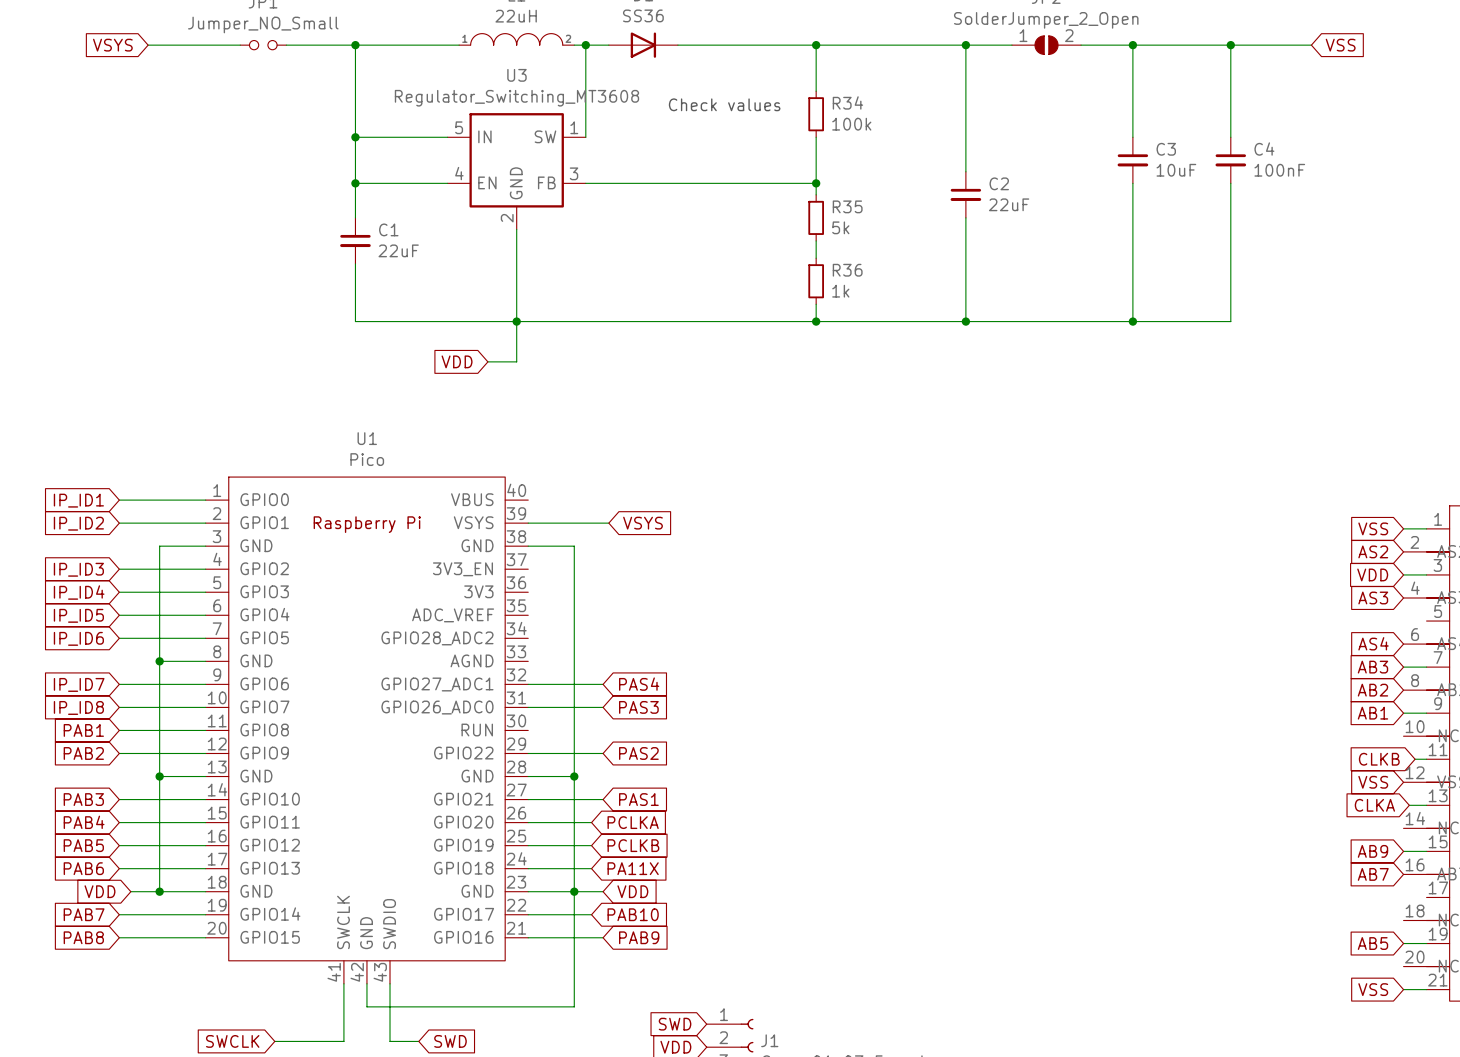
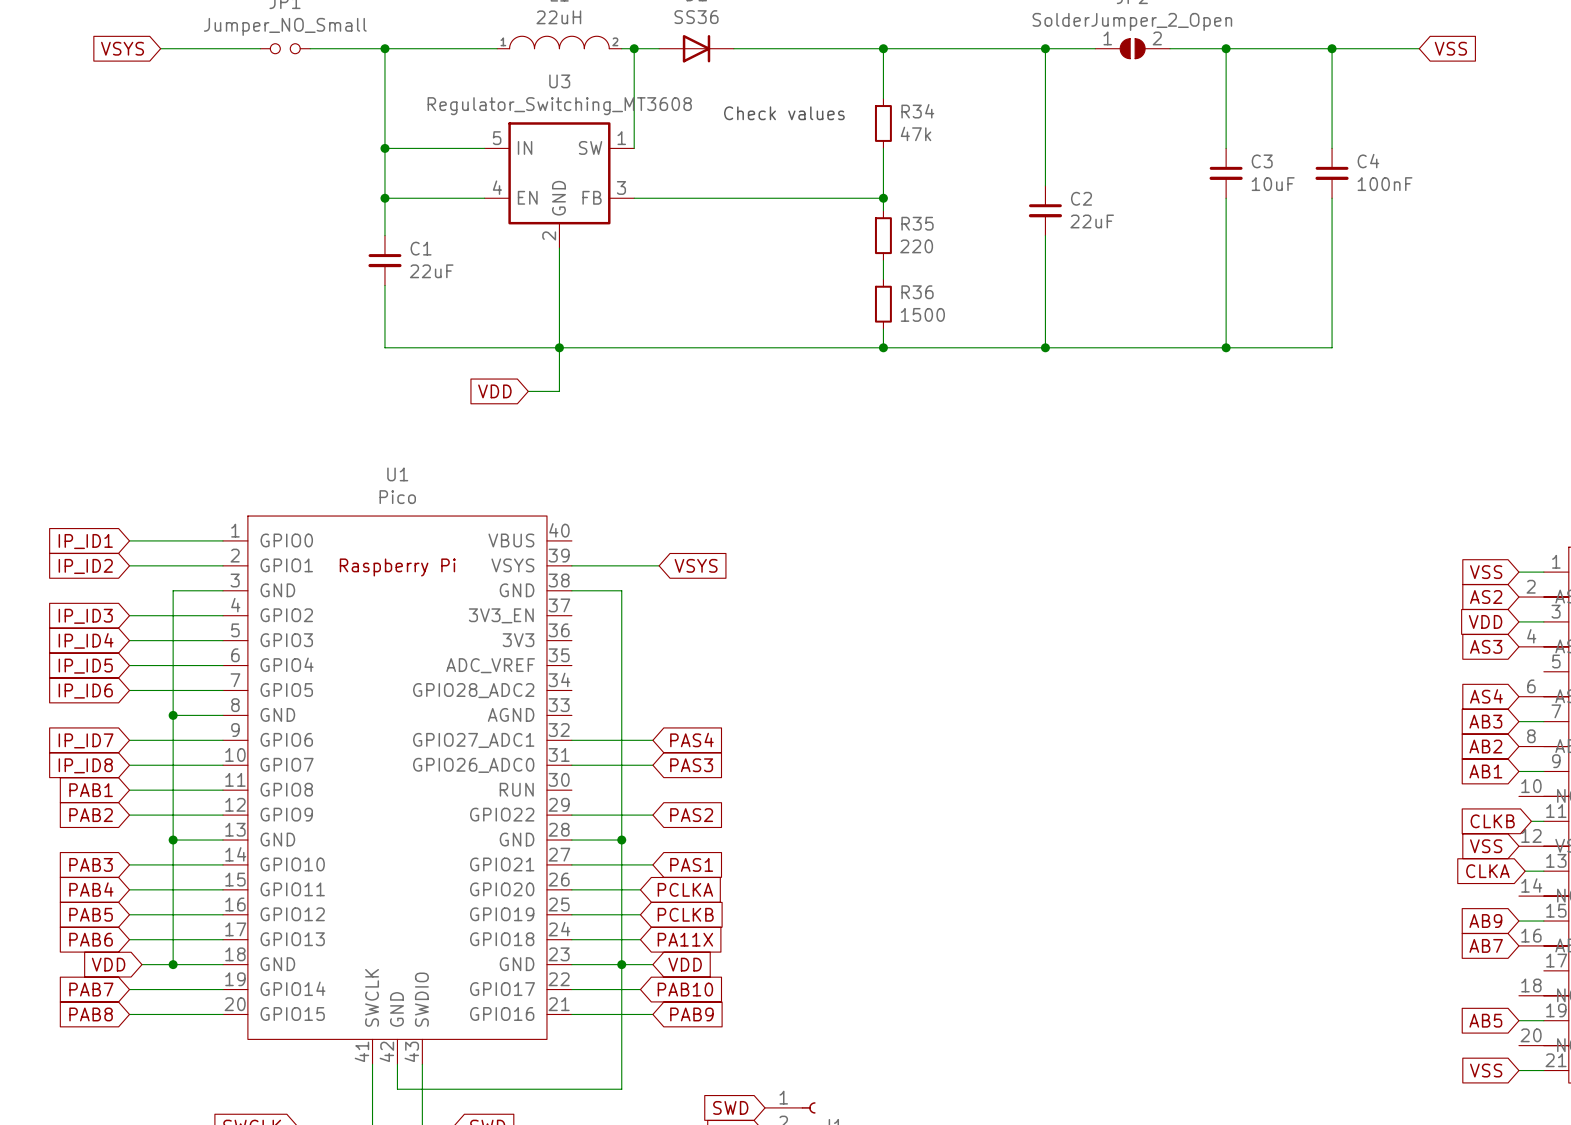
R34 value: 100k (851, 124) -> 47k (916, 133)
R35 value: 5k (840, 227) -> 220 (916, 246)
R36 value: 1k (840, 291) -> 1500 (922, 314)

